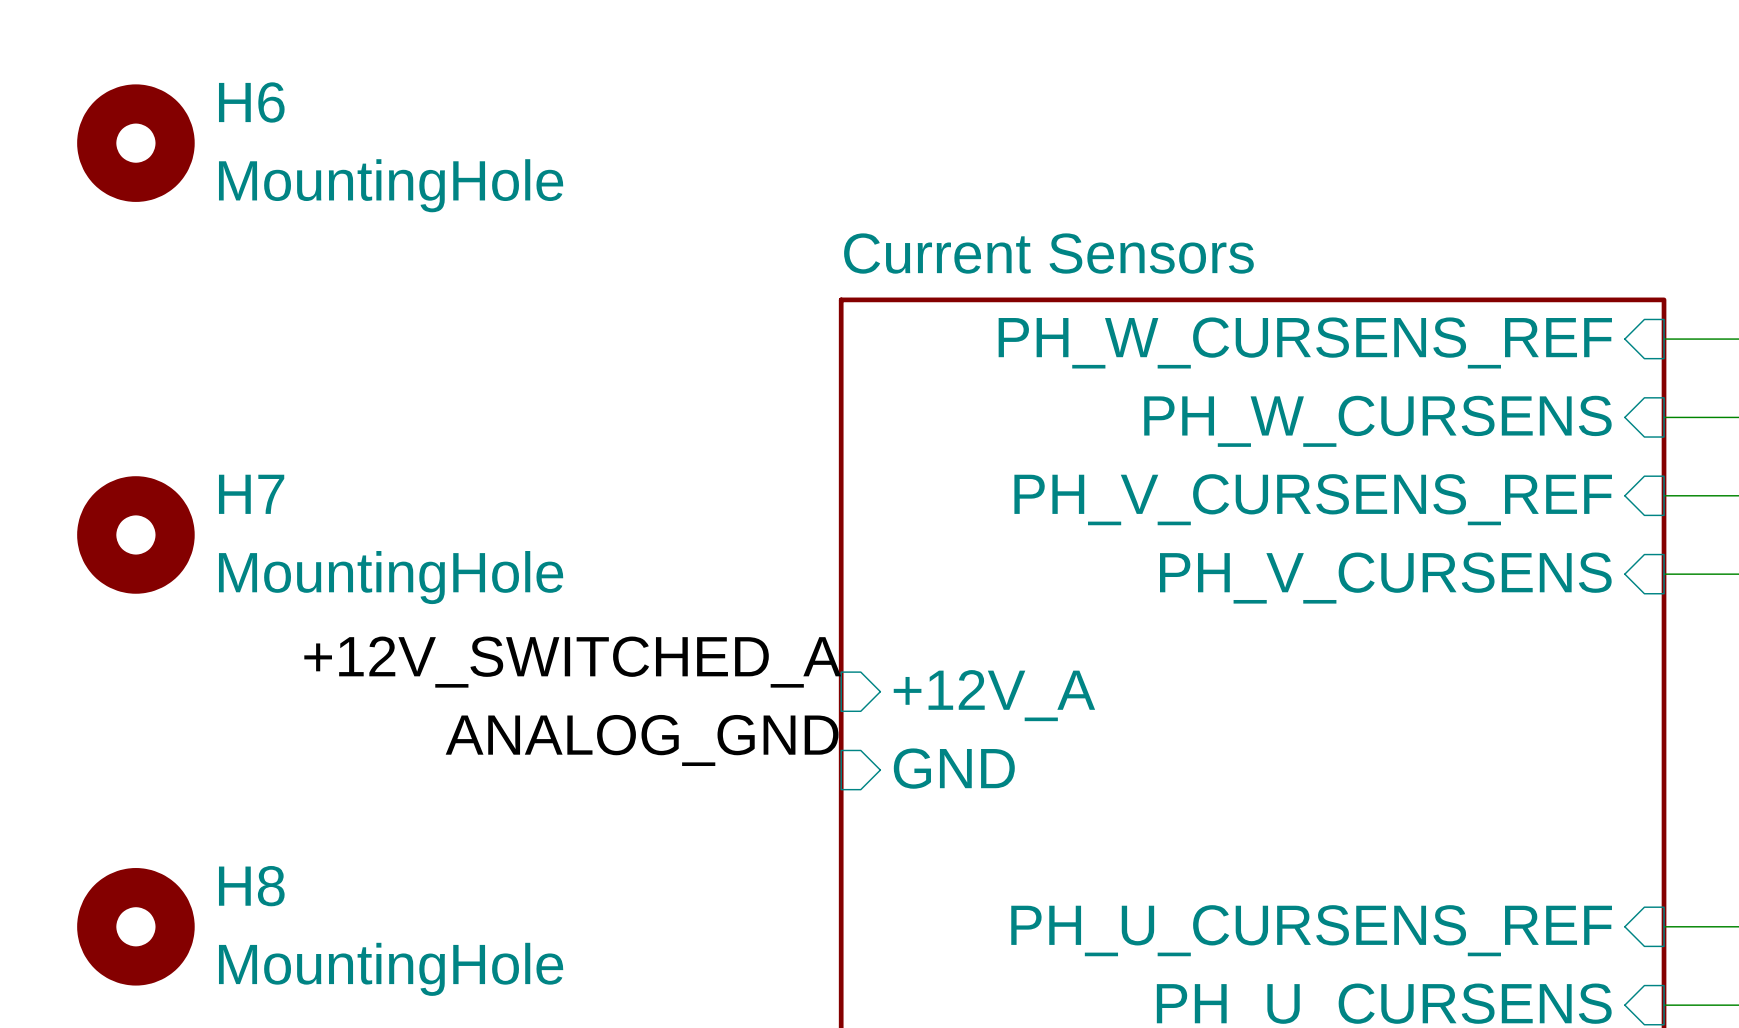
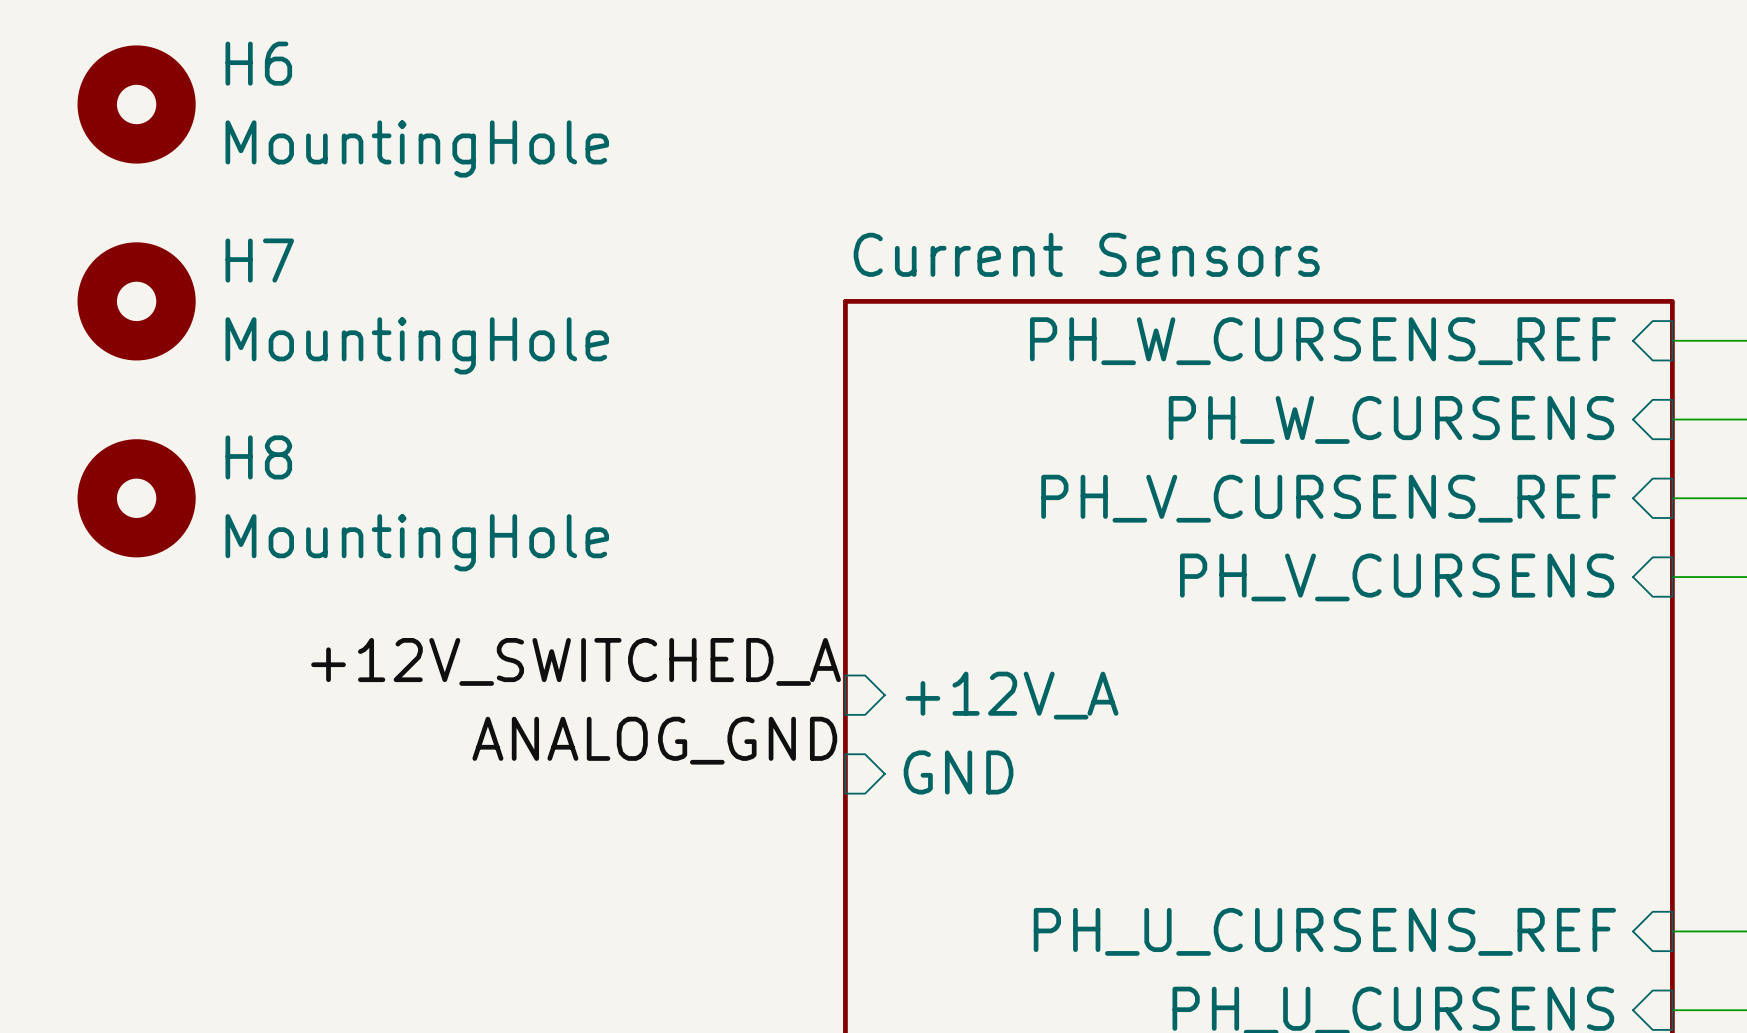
H6 position: (135, 143) -> (136, 104)
H7 position: (135, 534) -> (136, 301)
H8 position: (135, 926) -> (136, 498)

